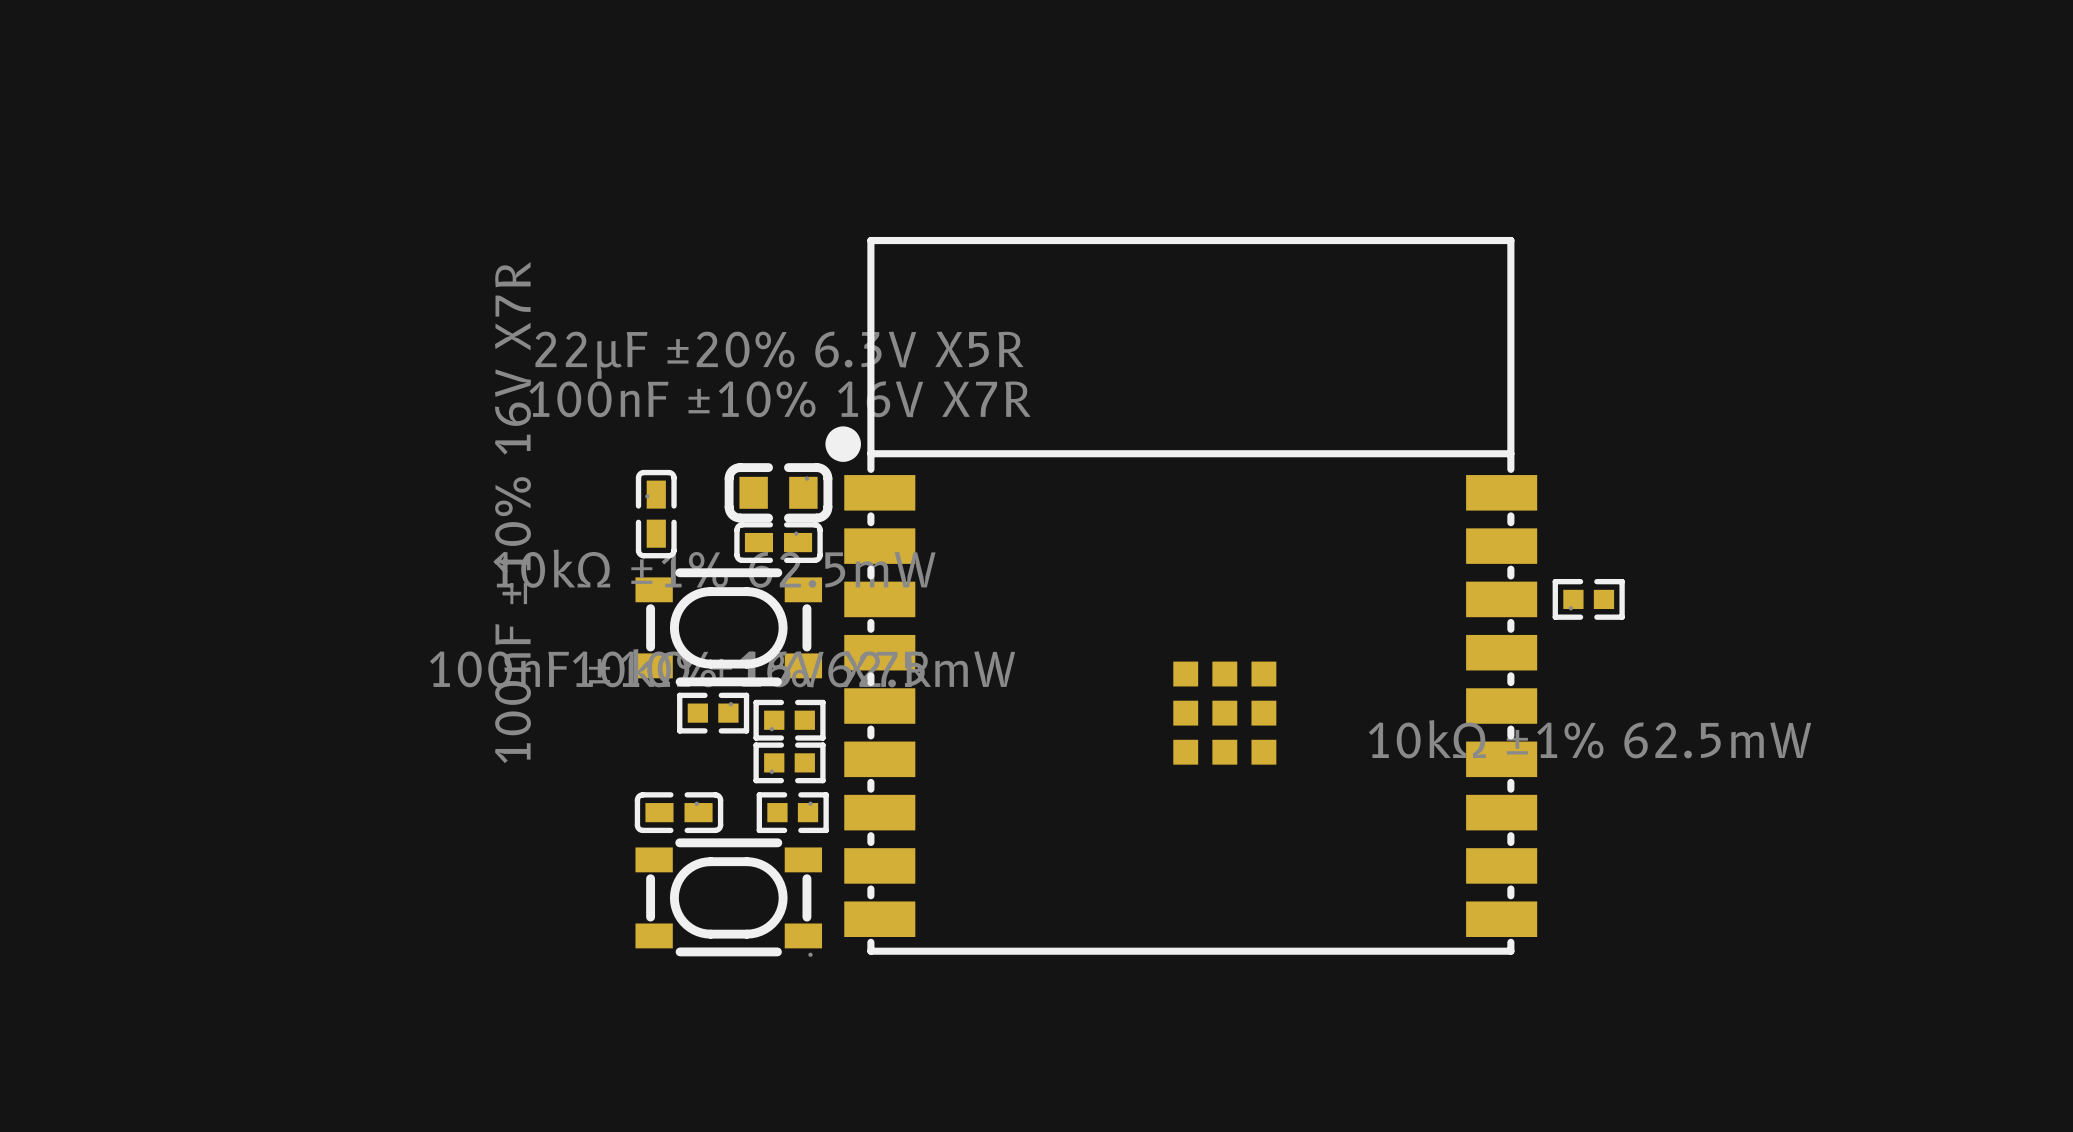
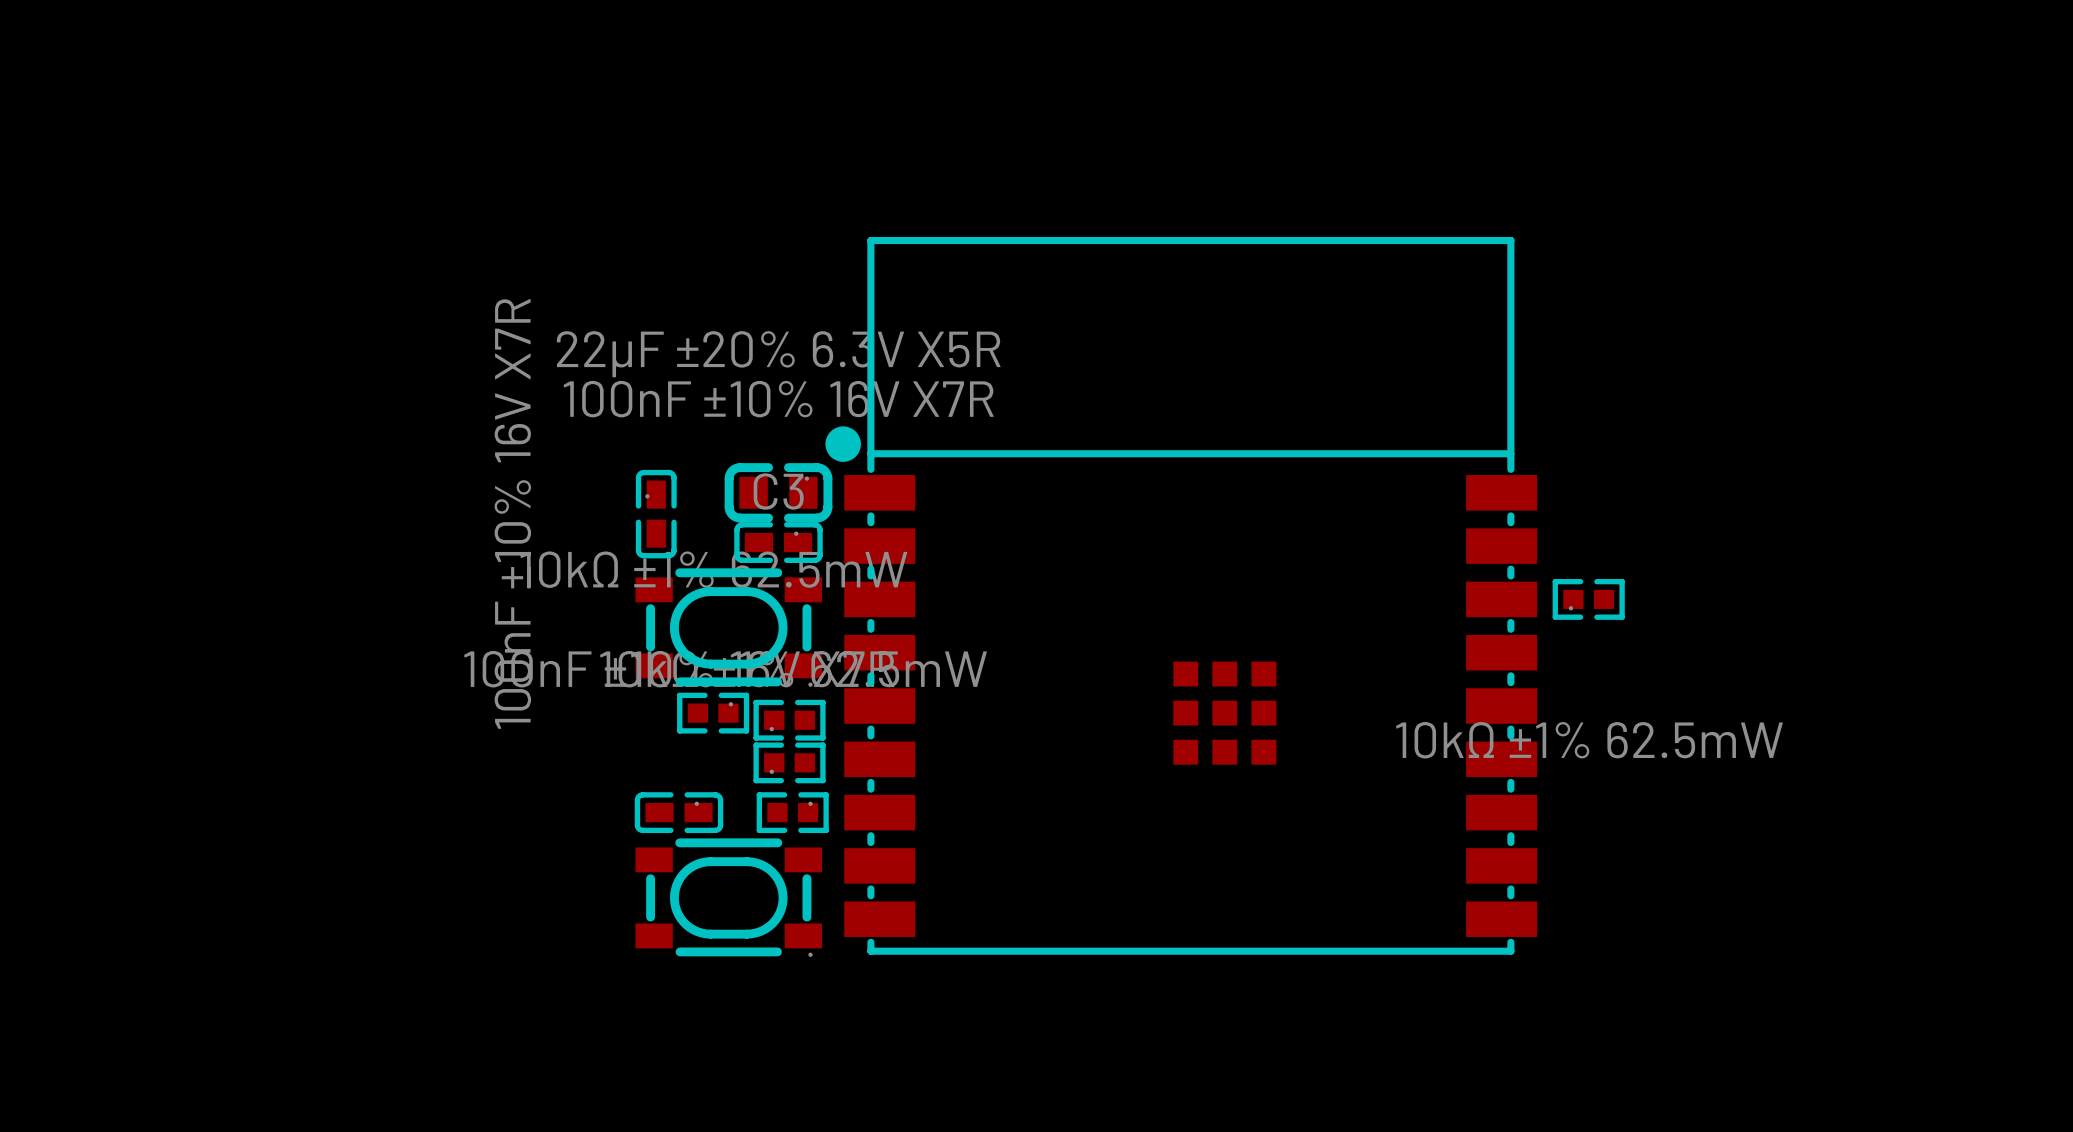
C3 name: none -> C3 (778, 491)

